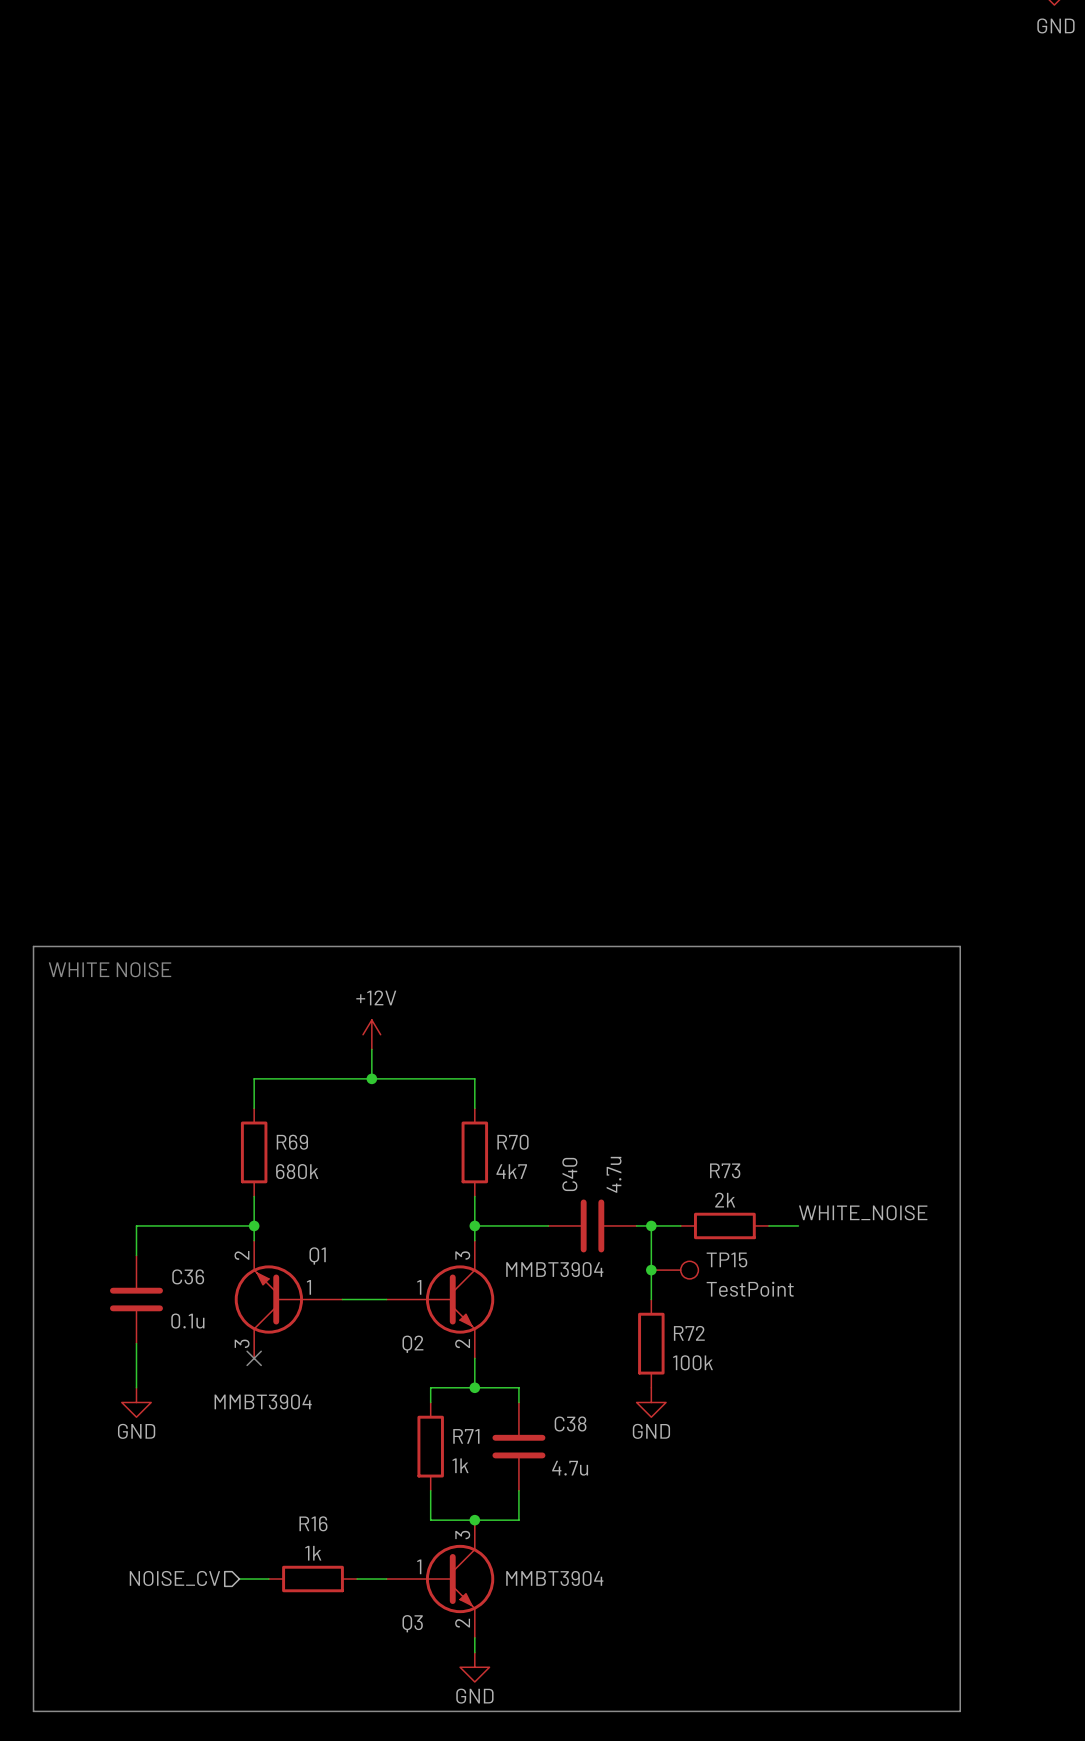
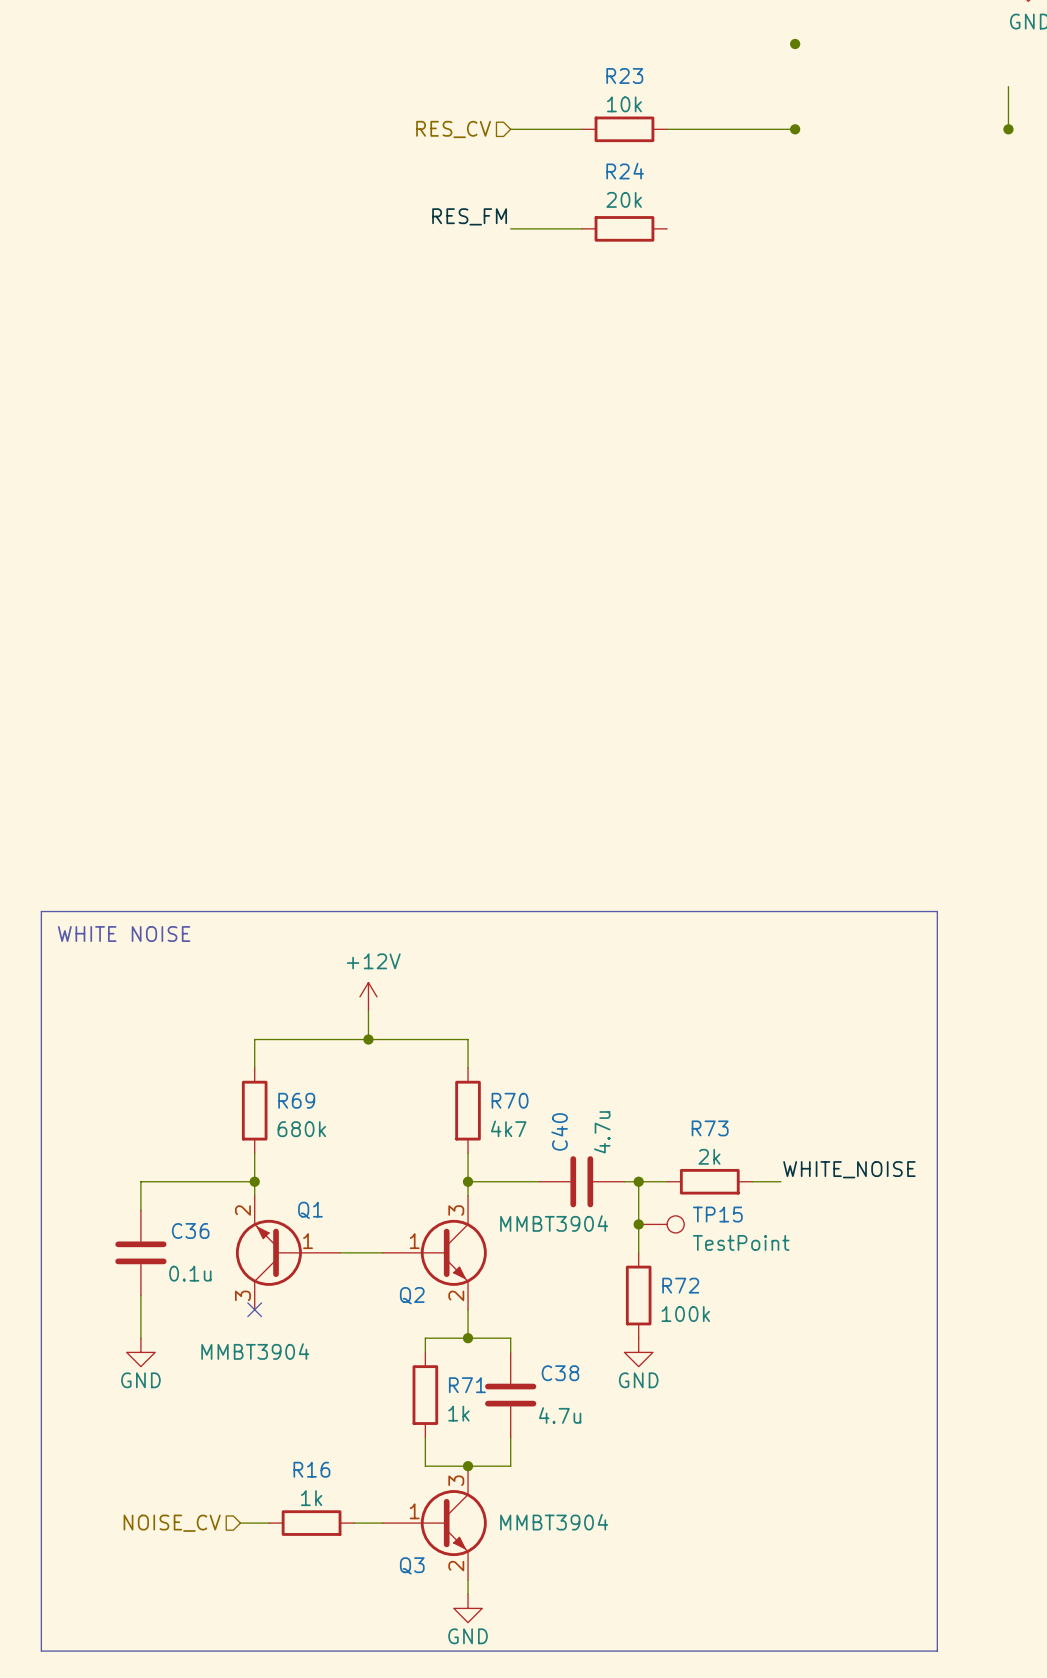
junction: none -> (795, 43)
wire: none -> (1008, 86) (1008, 129)
hierarchical label: none -> RES_CV (453, 129)
wire: none -> (510, 129) (581, 129)
R23: none -> 10k (624, 129)
wire: none -> (667, 129) (795, 129)
junction: none -> (795, 129)
junction: none -> (1008, 129)
label: none -> RES_FM (469, 216)
wire: none -> (510, 228) (581, 228)
R24: none -> 20k (624, 228)

